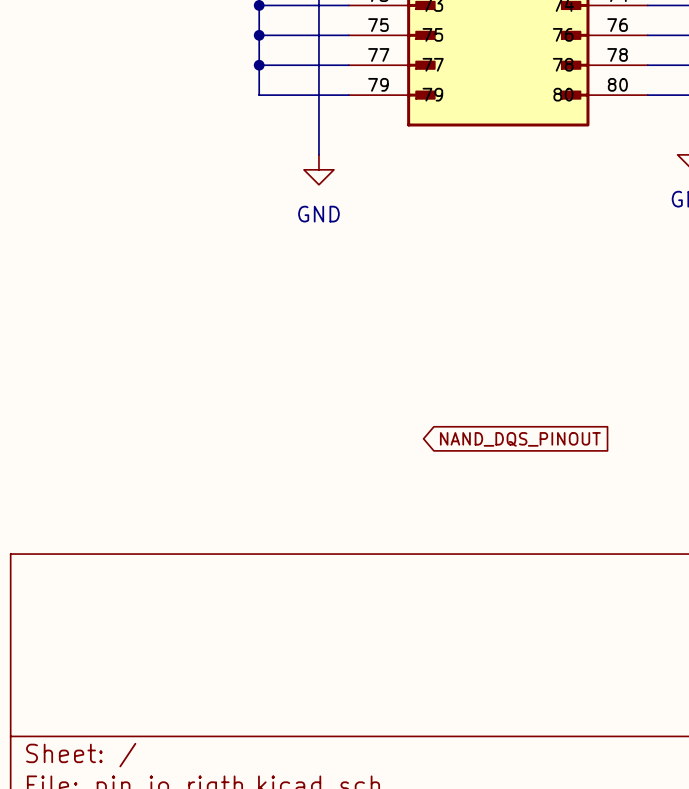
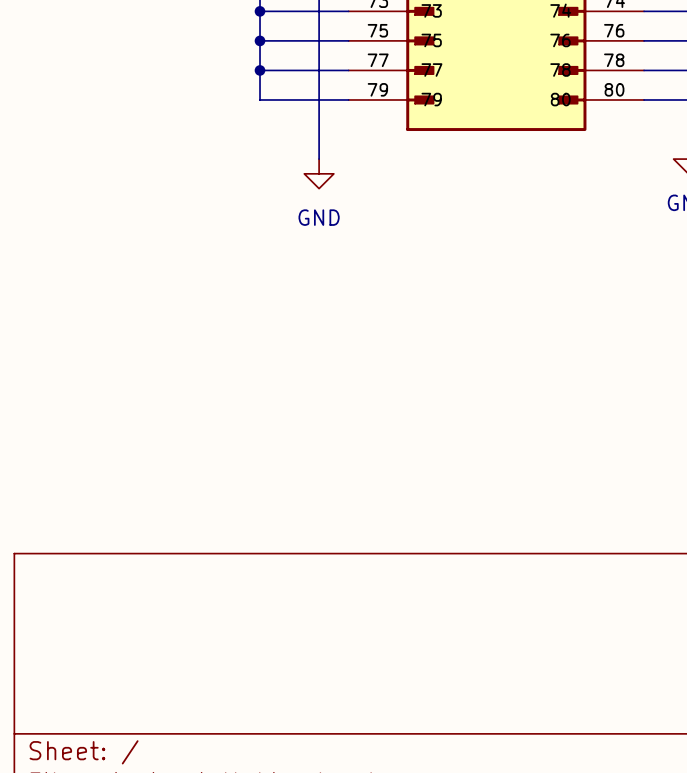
global label: NAND_DQS_PINOUT (520, 439) -> none

